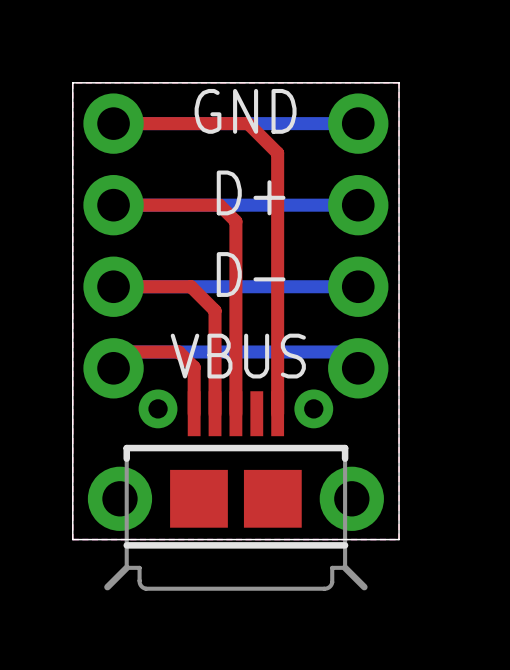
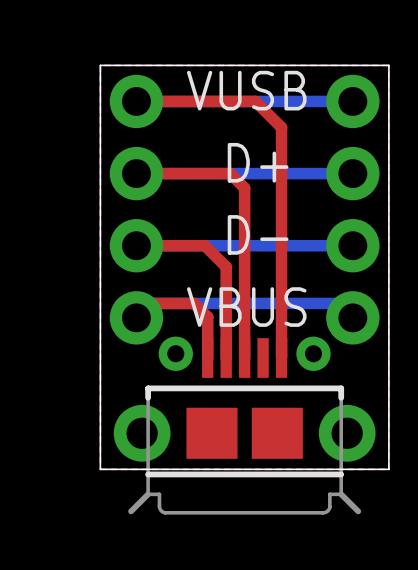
text: GND (245, 111) -> VUSB (246, 90)

